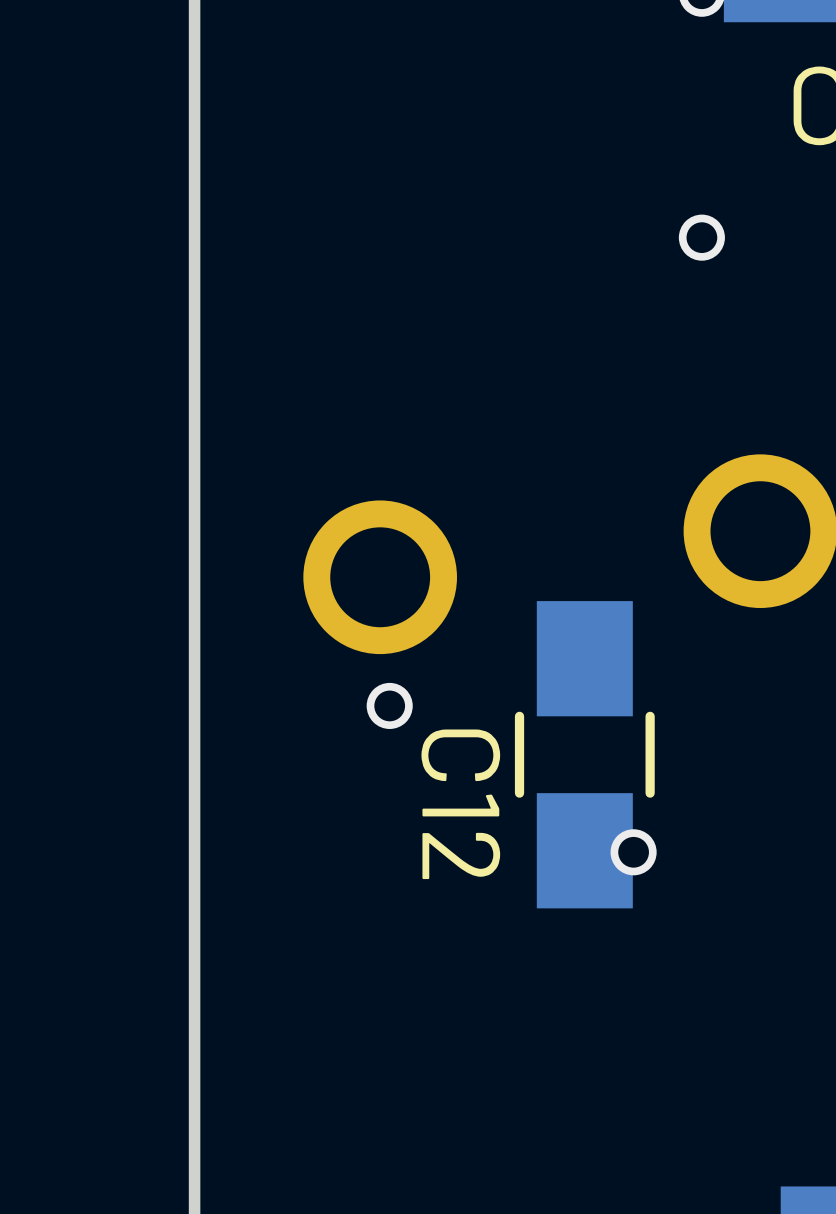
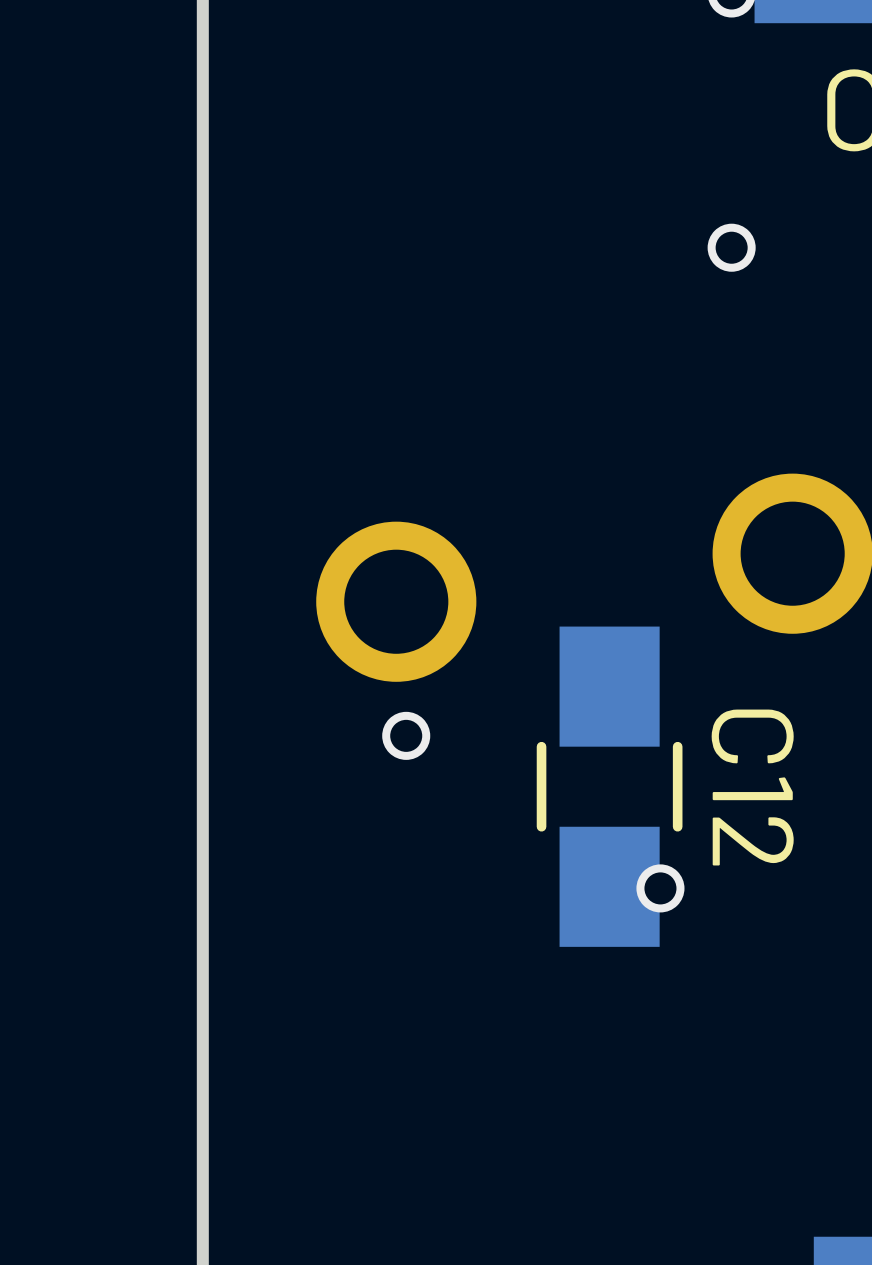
C12 name position: C12 (460, 804) -> C12 (752, 787)

